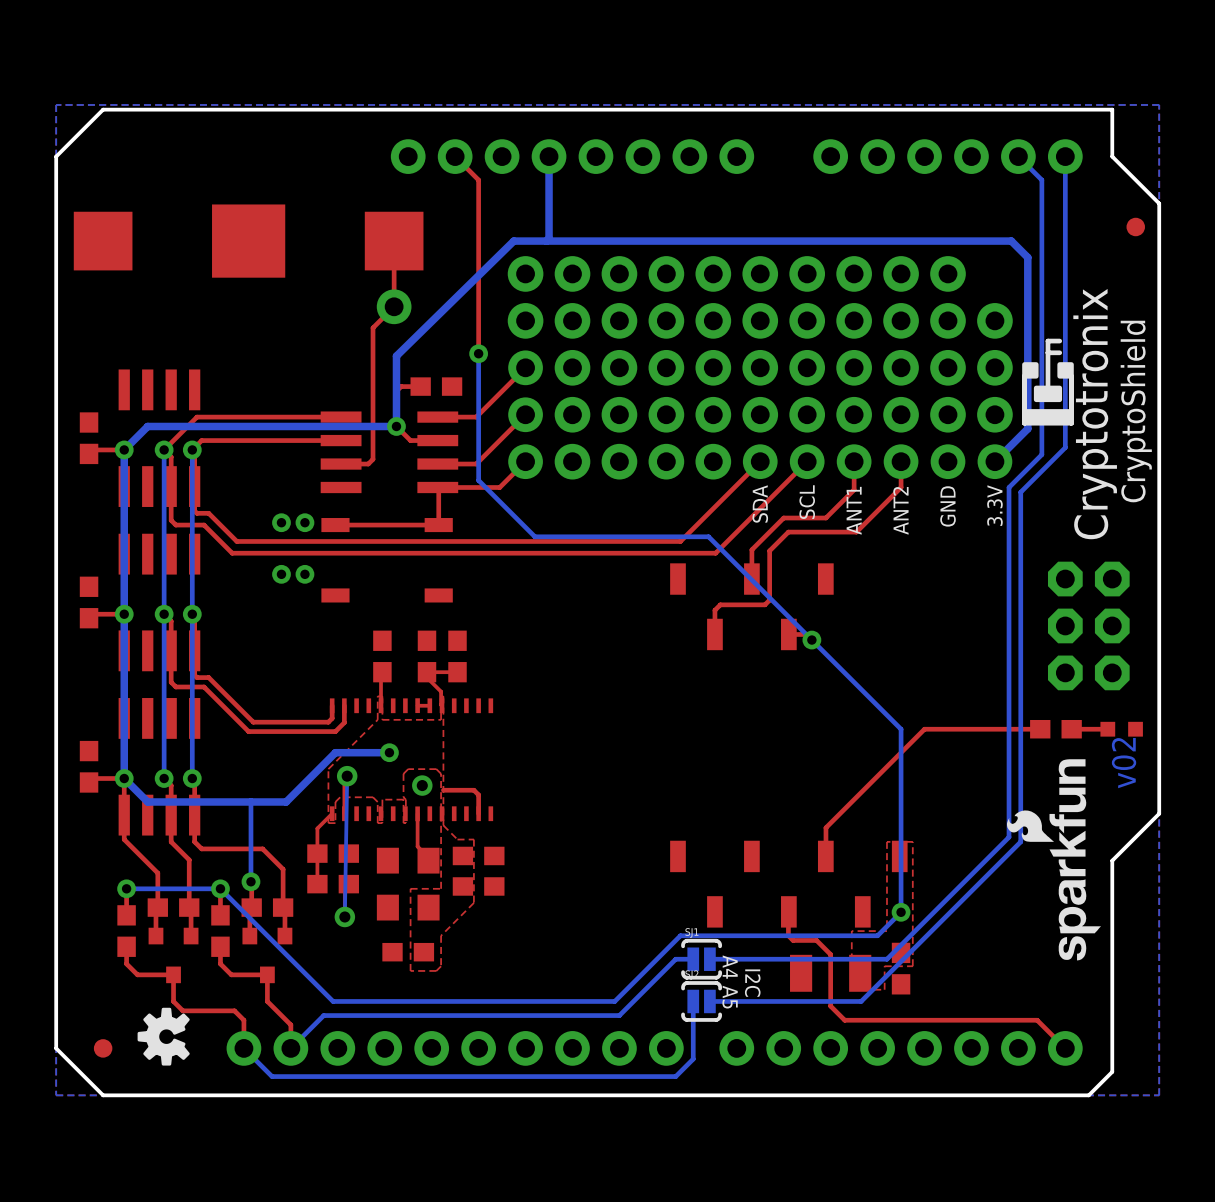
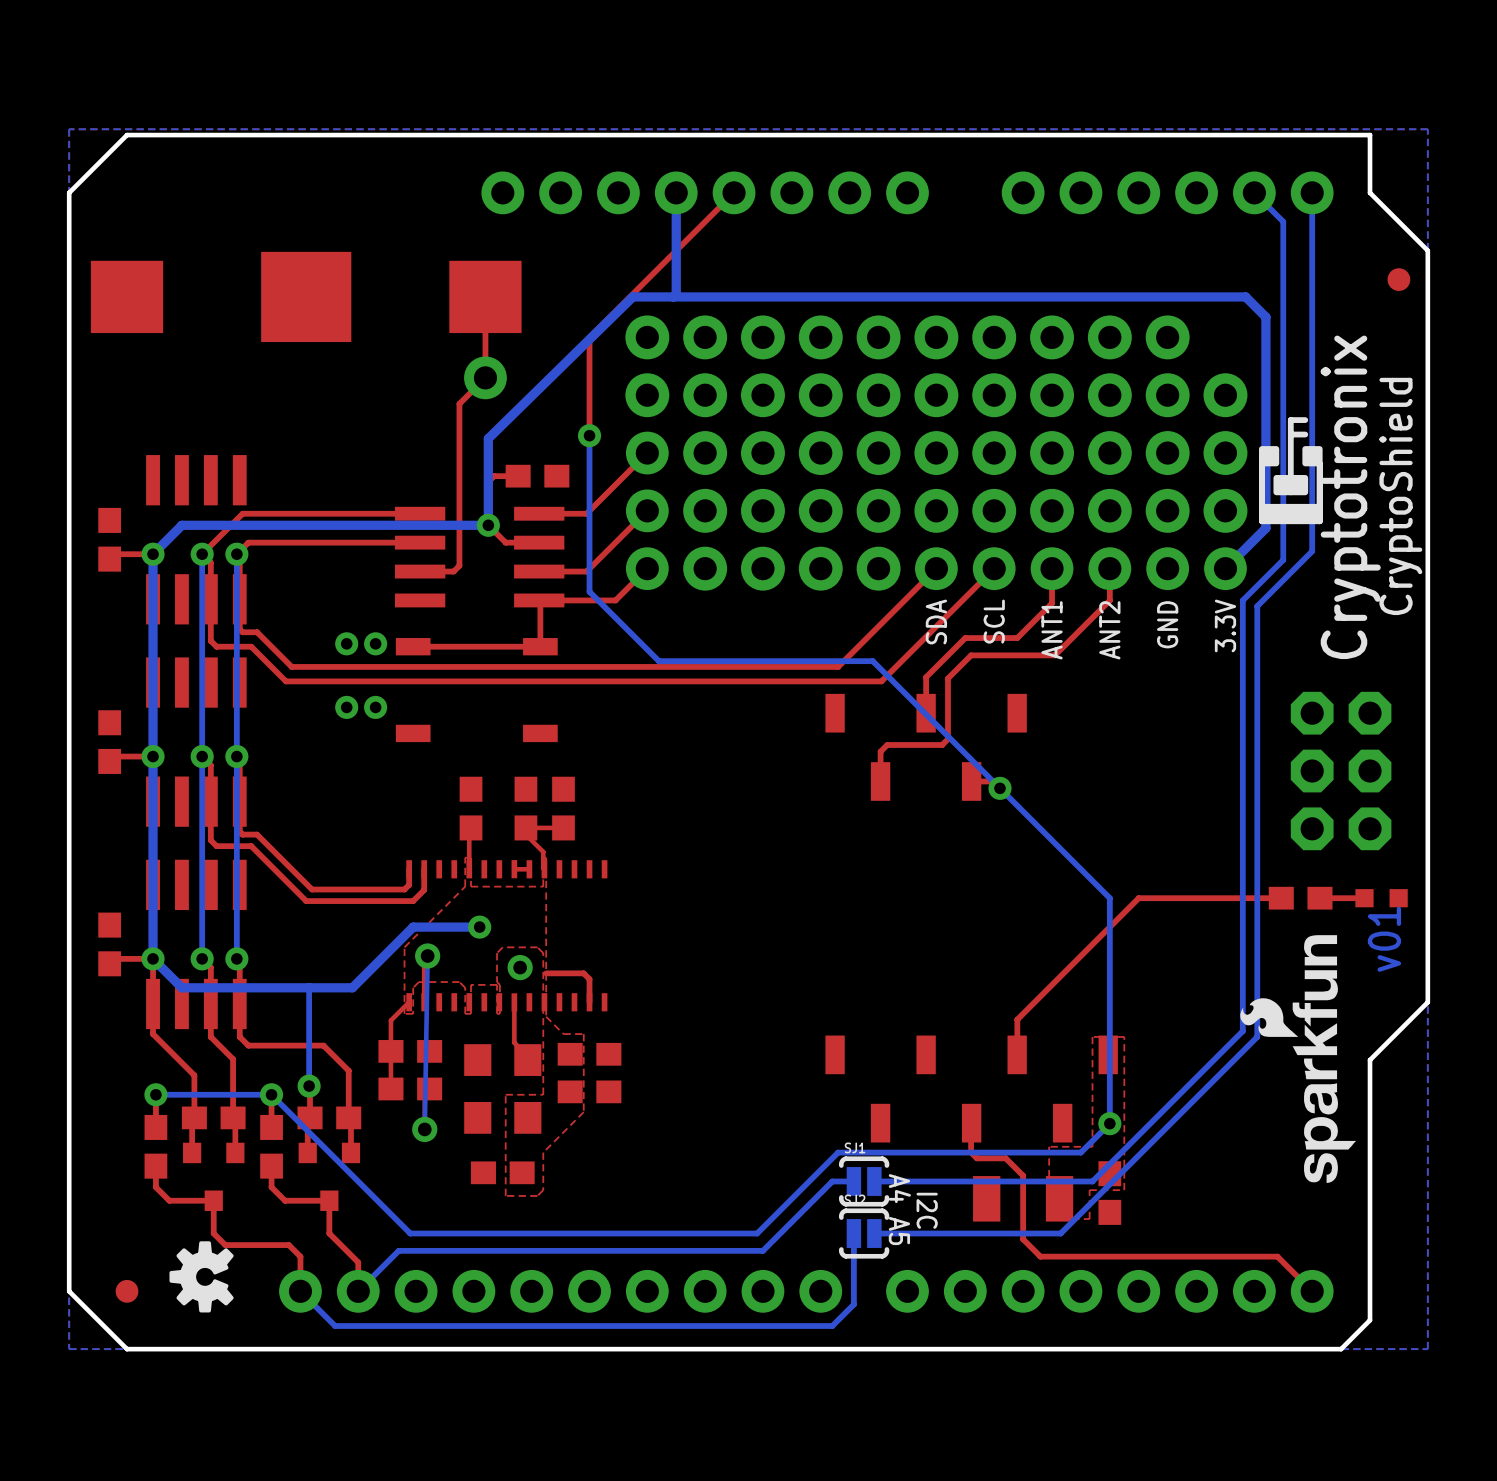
top track: (455, 156) (478, 180) (478, 273) -> (734, 192) (589, 337)
text: v02 (1124, 763) -> v01 (1384, 939)

